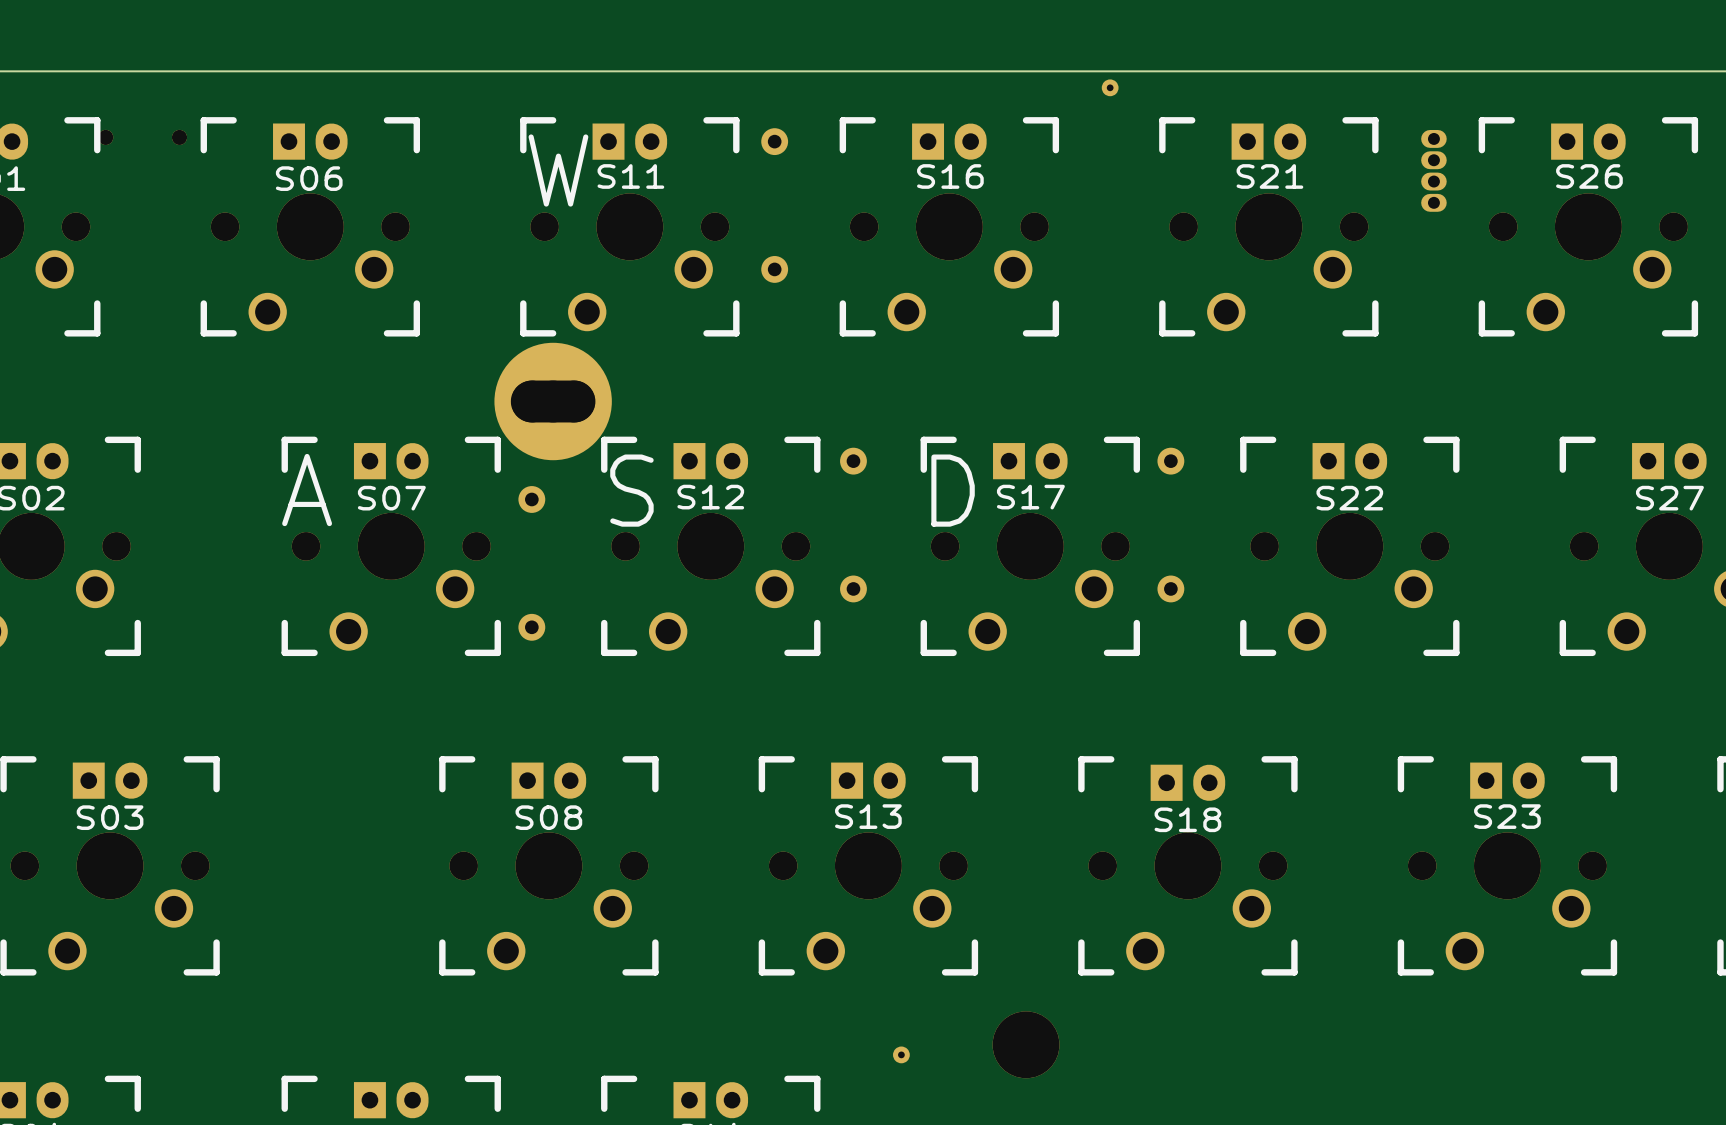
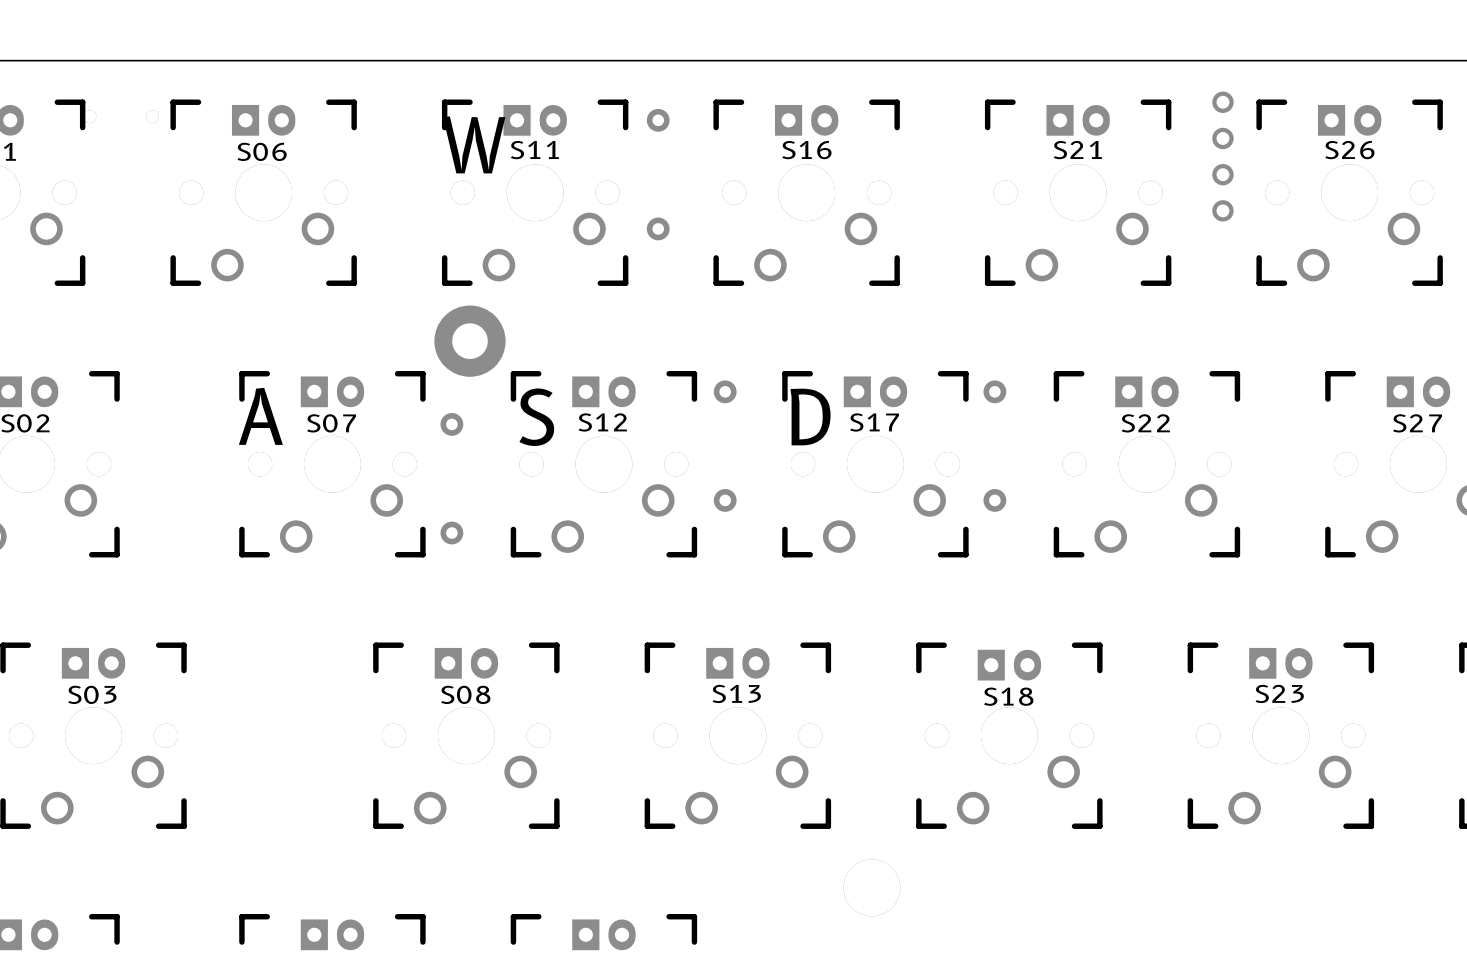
part: (1110, 87) -> none
part: none -> (1222, 102)
part: (1433, 138) -> none
part footprint: [1421, 151, 1447, 170] -> [1212, 127, 1234, 150]
part: (1433, 181) -> none
part footprint: [1421, 193, 1447, 212] -> [1212, 163, 1234, 186]
part: none -> (1222, 210)
part footprint: [494, 342, 612, 461] -> [434, 305, 506, 377]
part: (901, 1054) -> none

